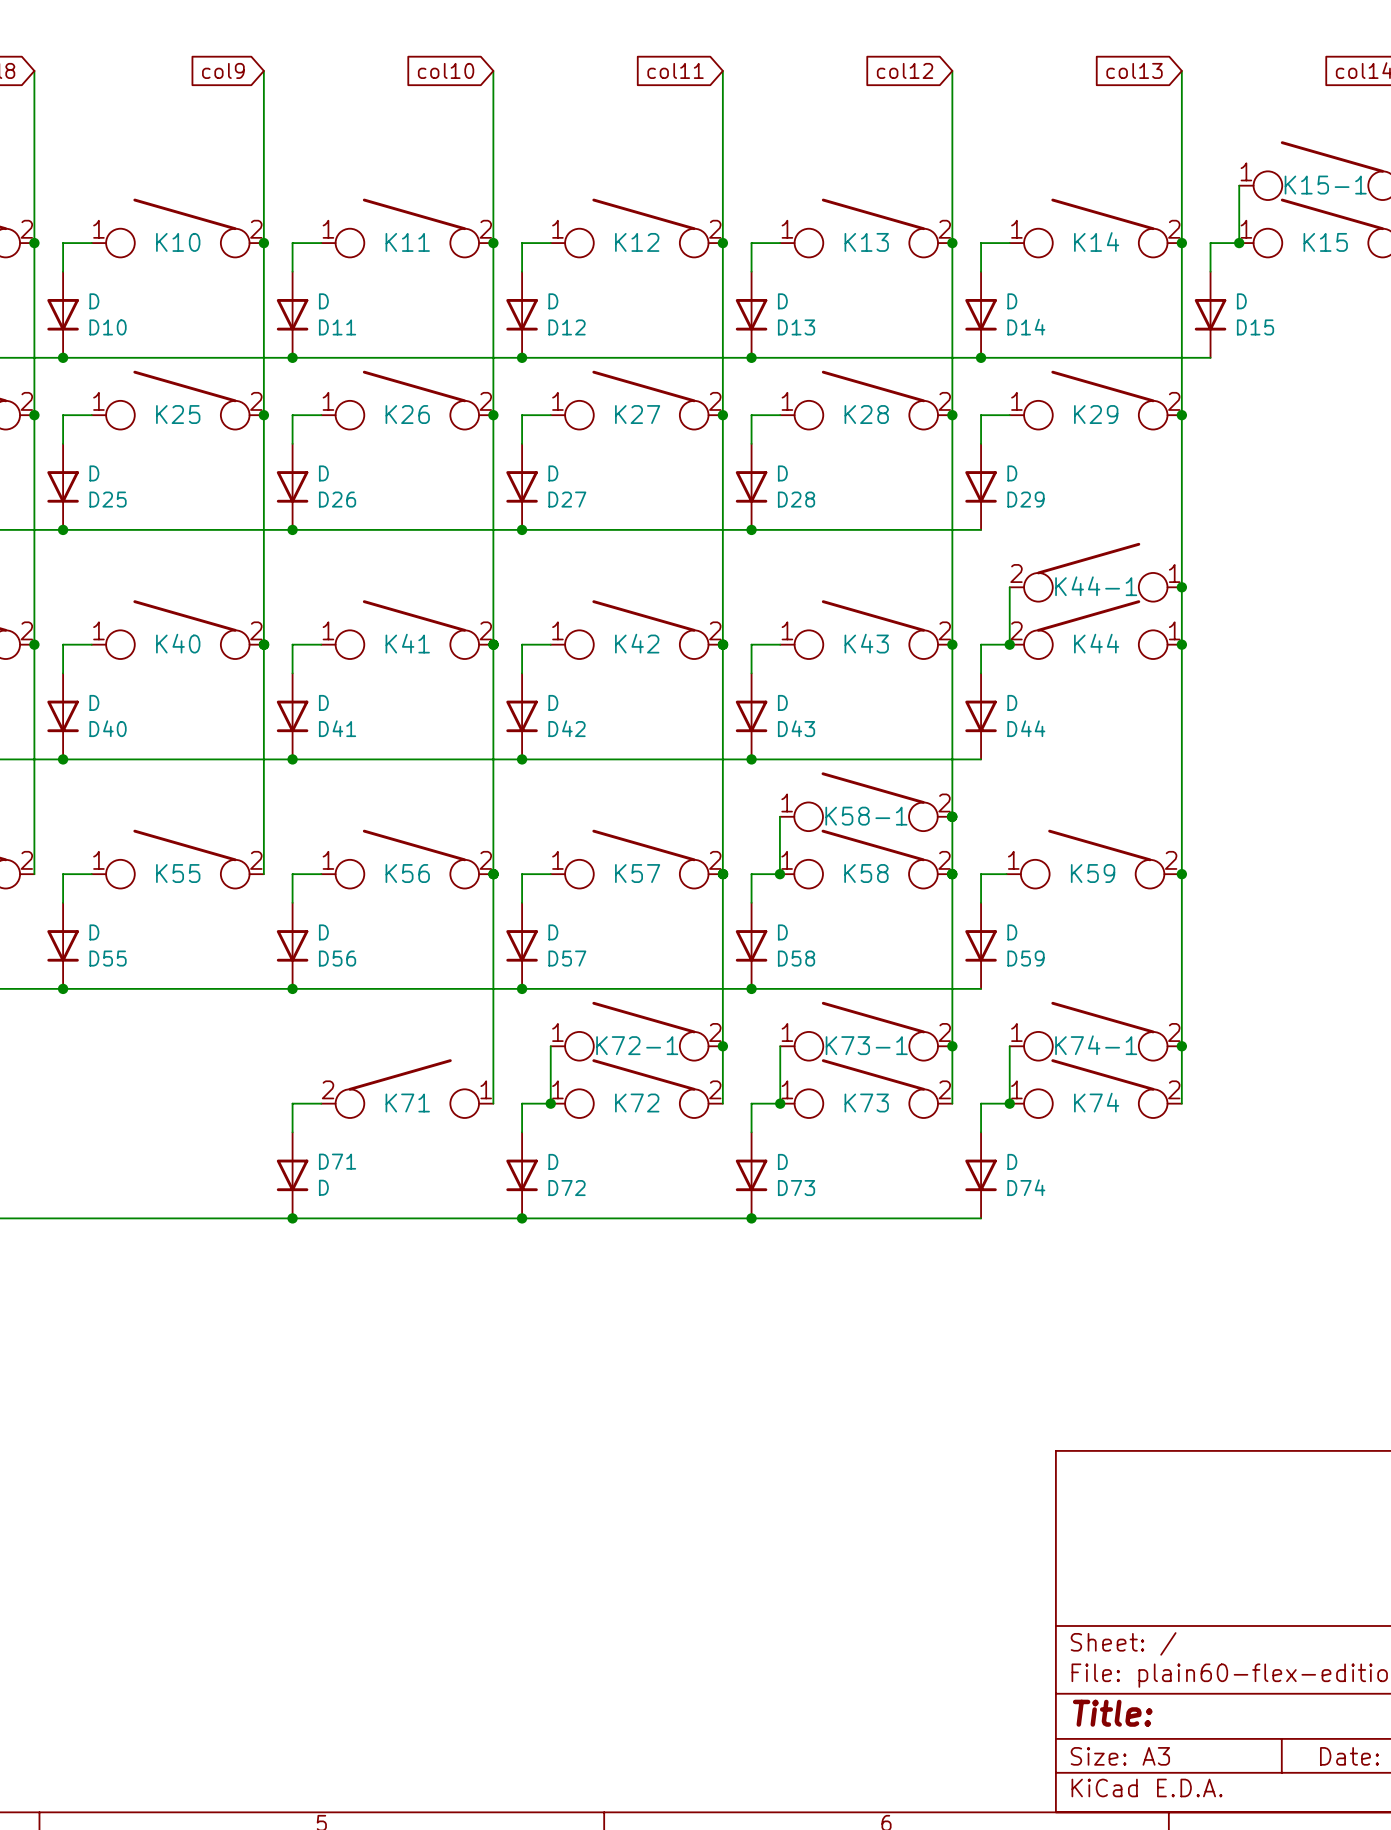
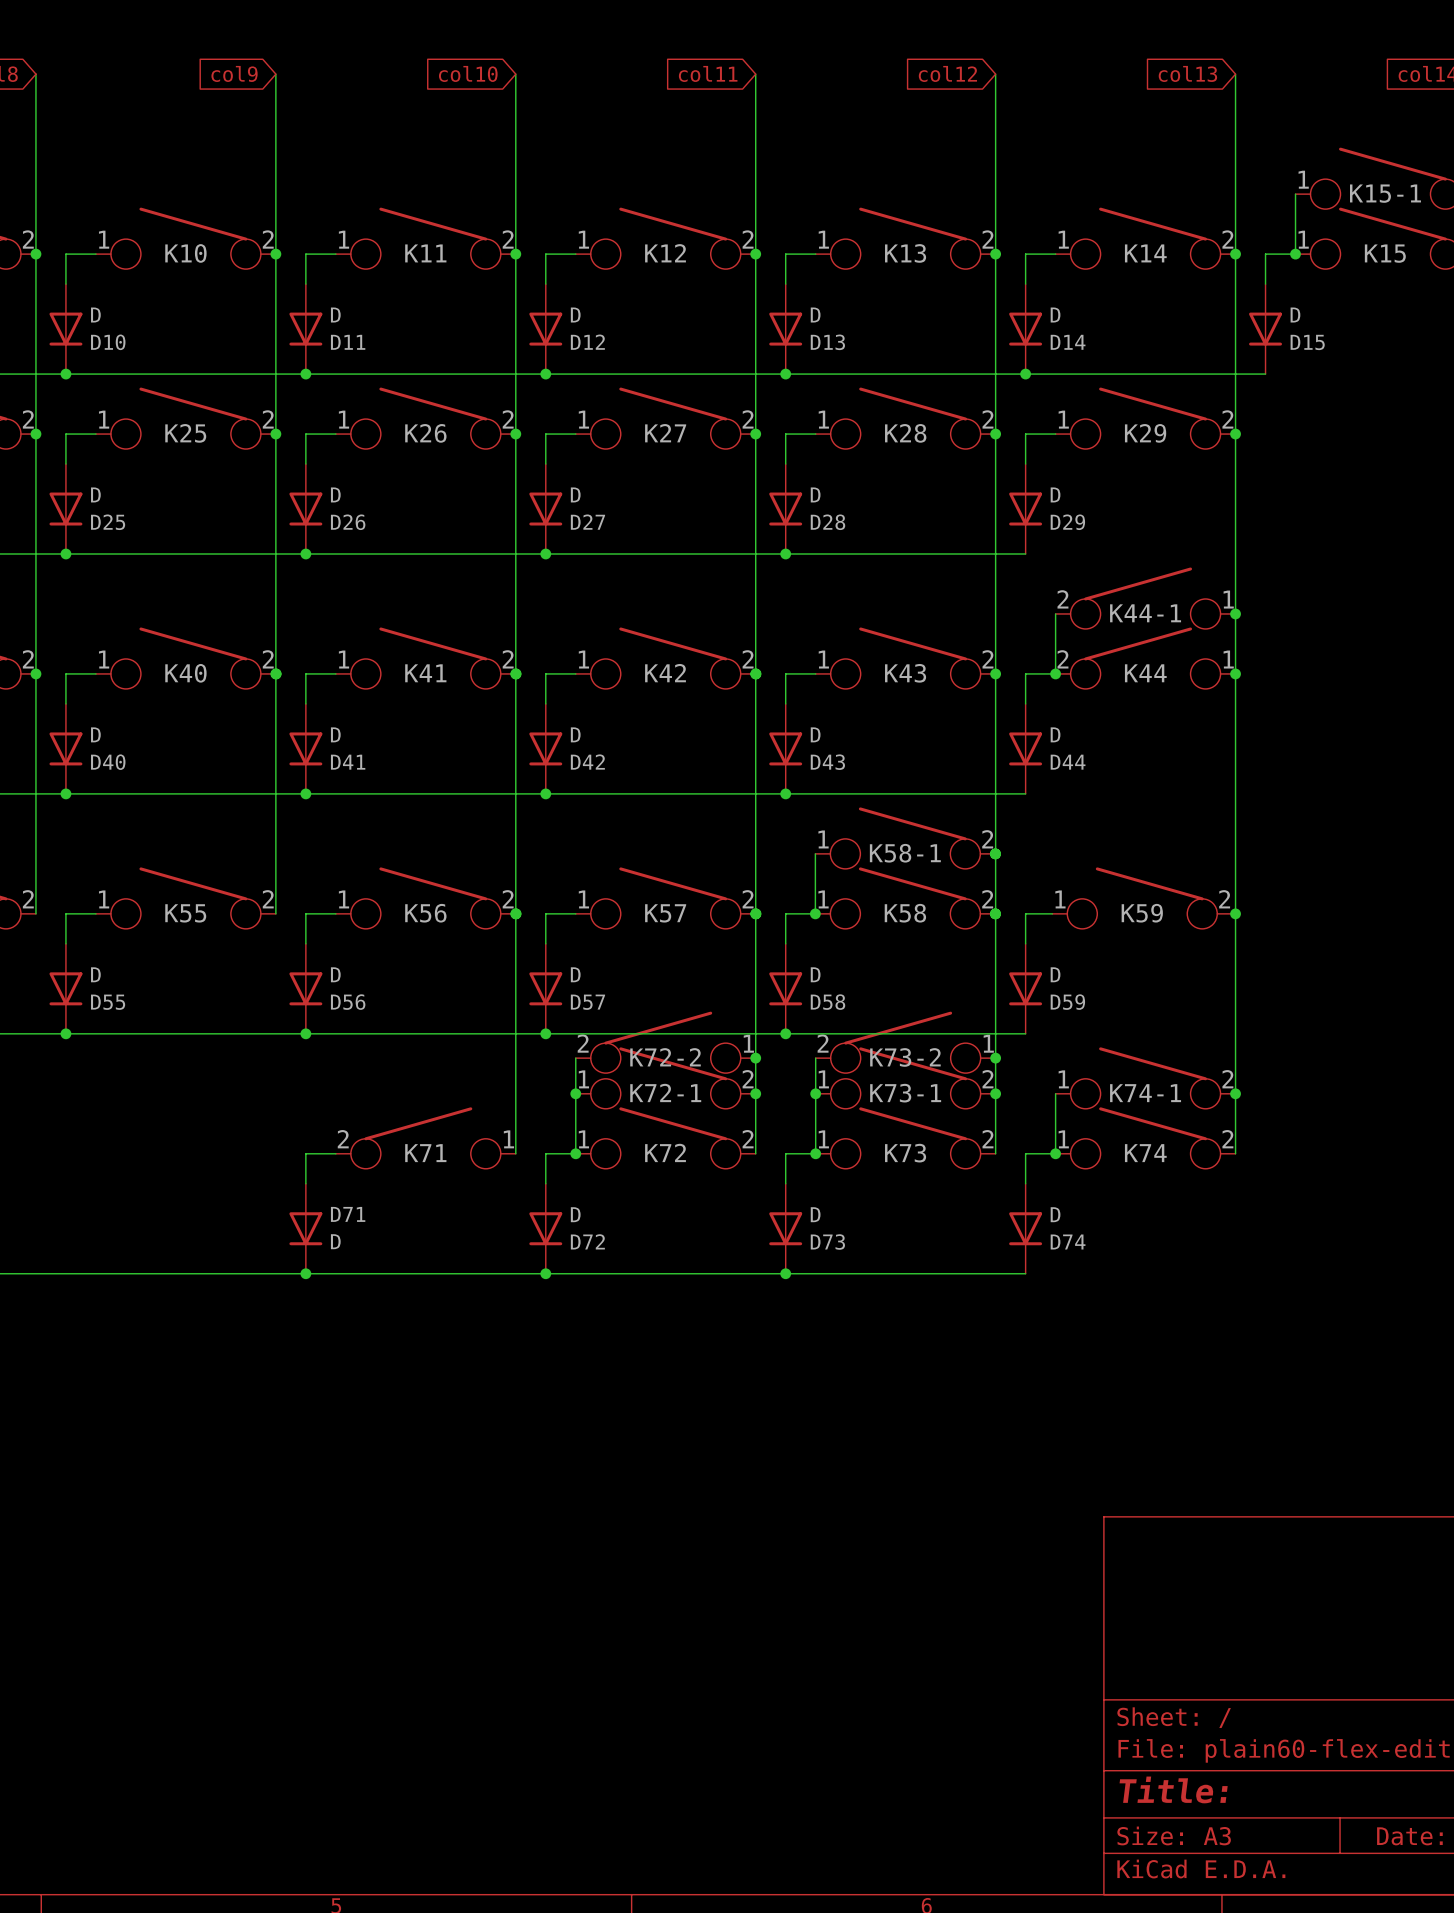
K72-2: none -> (665, 1042)
K73-2: none -> (905, 1042)
wire: none -> (575, 1058) (575, 1093)
junction: none -> (755, 1058)
wire: none -> (815, 1058) (815, 1093)
junction: none -> (995, 1058)
junction: none -> (575, 1093)
junction: none -> (815, 1093)

